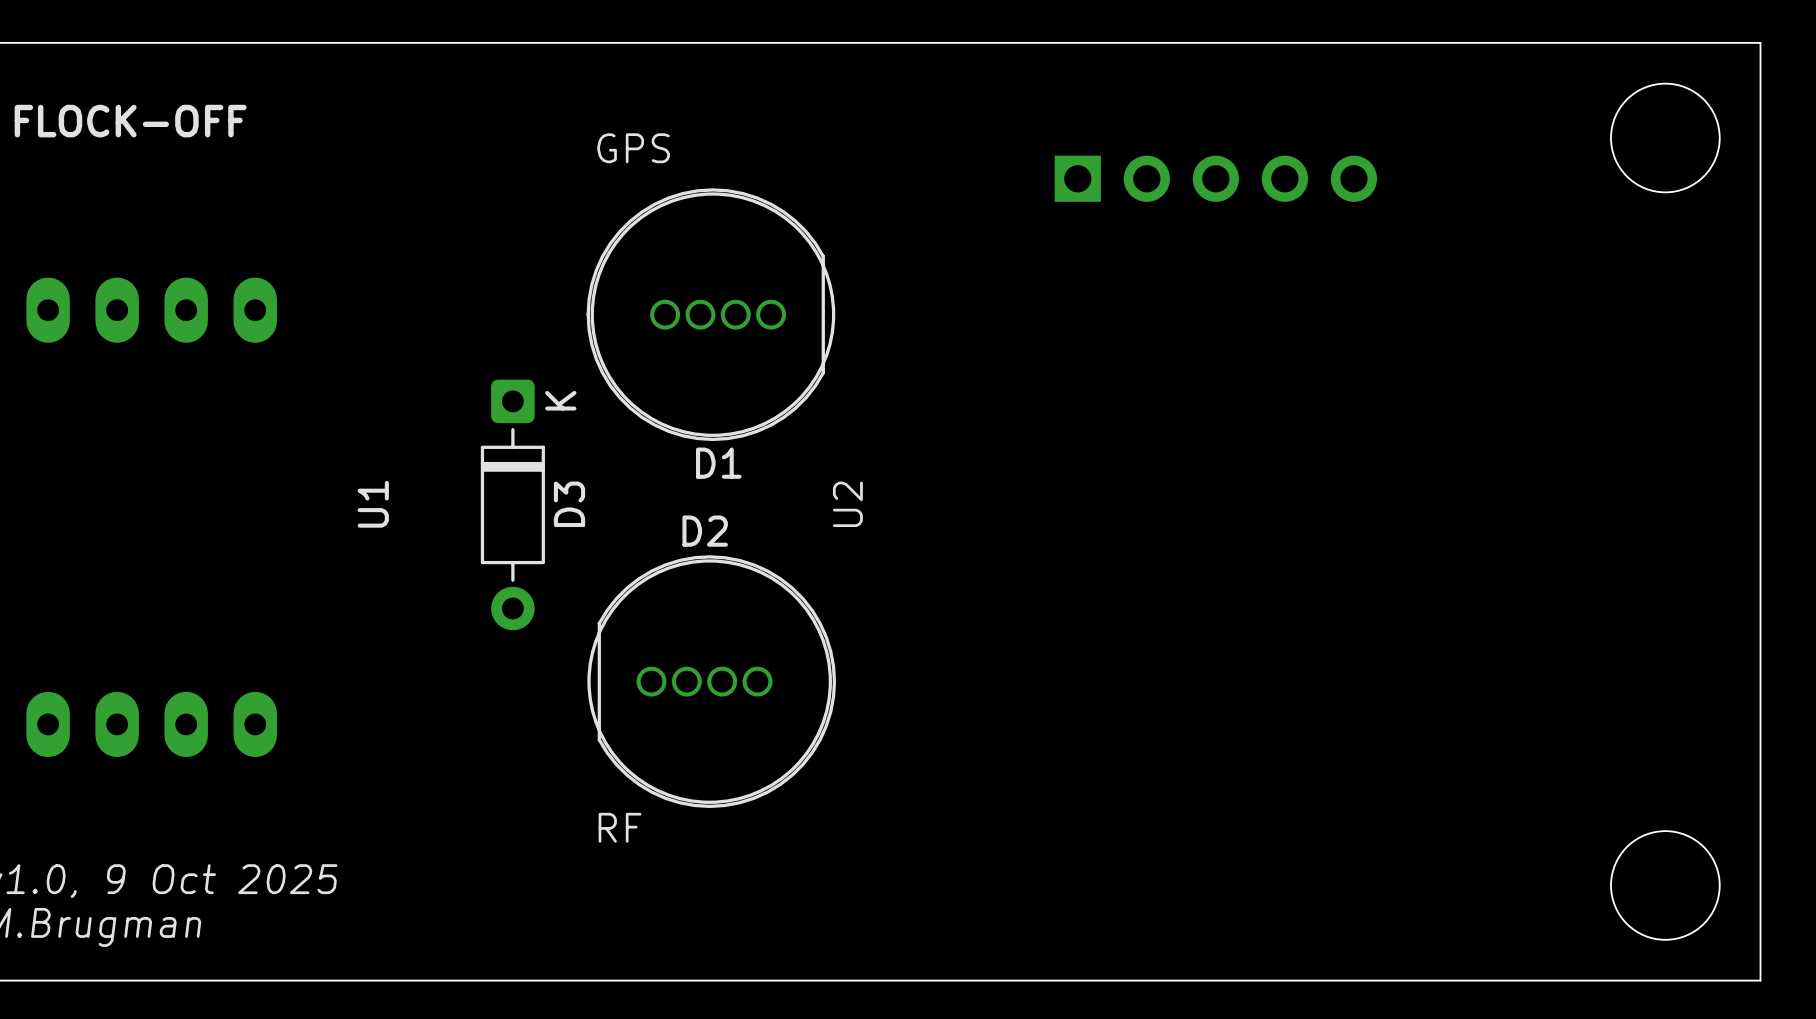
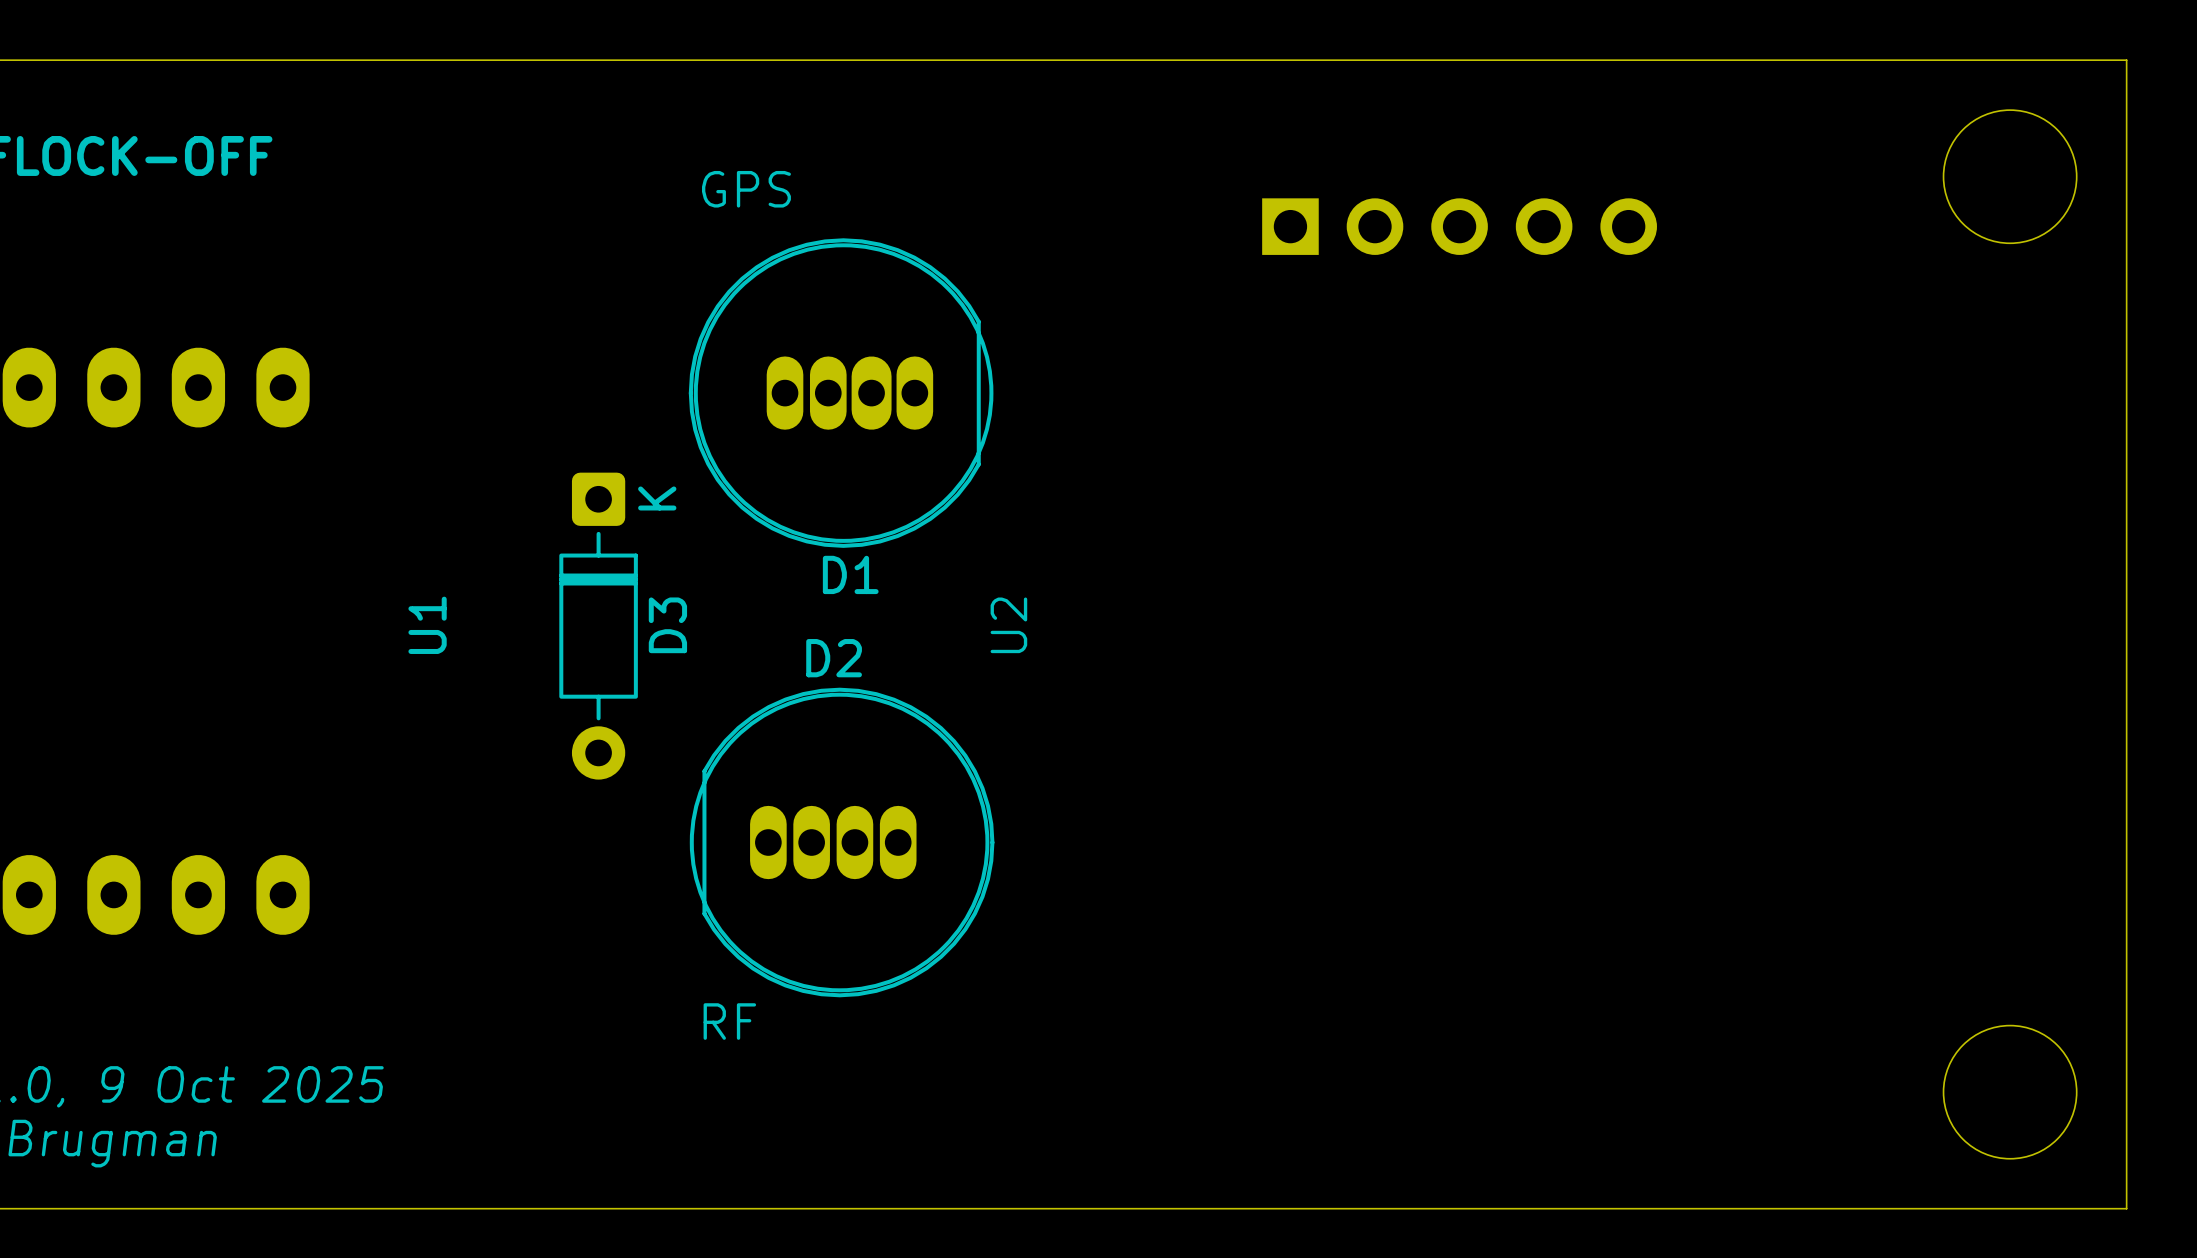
D1 footprint: [586, 188, 836, 442] -> [688, 238, 994, 548]
D2 footprint: [587, 555, 837, 809] -> [689, 687, 995, 998]

